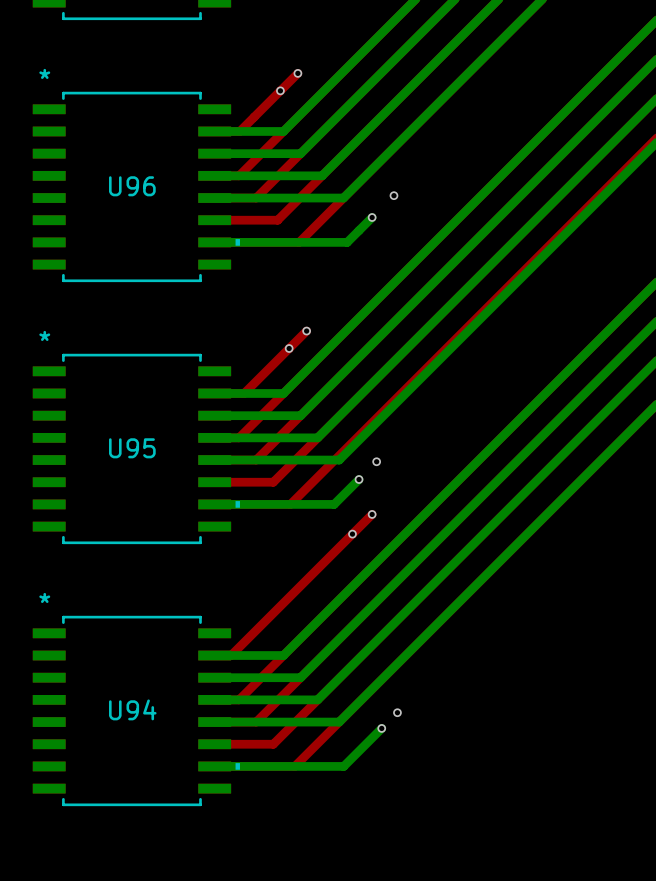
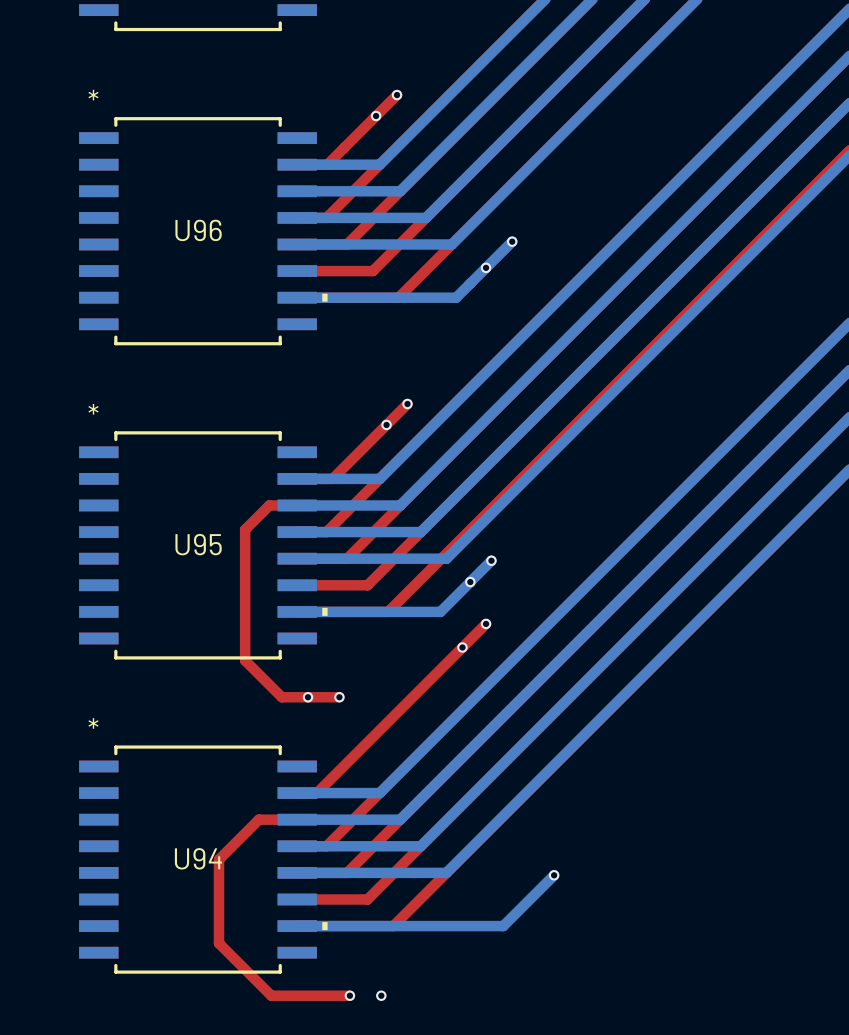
bottom track: none -> (512, 241) (486, 267)
top track: none -> (297, 505) (269, 505) (245, 529) (245, 660) (281, 697) (339, 697)
bottom track: none -> (491, 560) (470, 581)
via: none -> (308, 697)
via: none -> (339, 697)
top track: none -> (297, 819) (258, 819) (218, 859) (218, 943) (271, 995) (349, 995)
via: (397, 712) -> none
via: none -> (554, 875)
bottom track: (381, 728) (343, 766) -> (554, 875) (503, 926) (452, 926)
via: (381, 728) -> none
via: none -> (349, 995)
via: none -> (381, 995)

